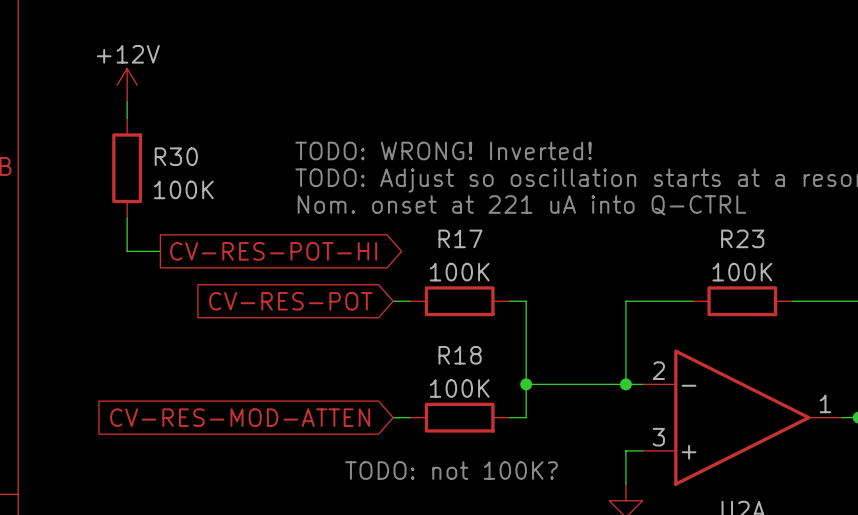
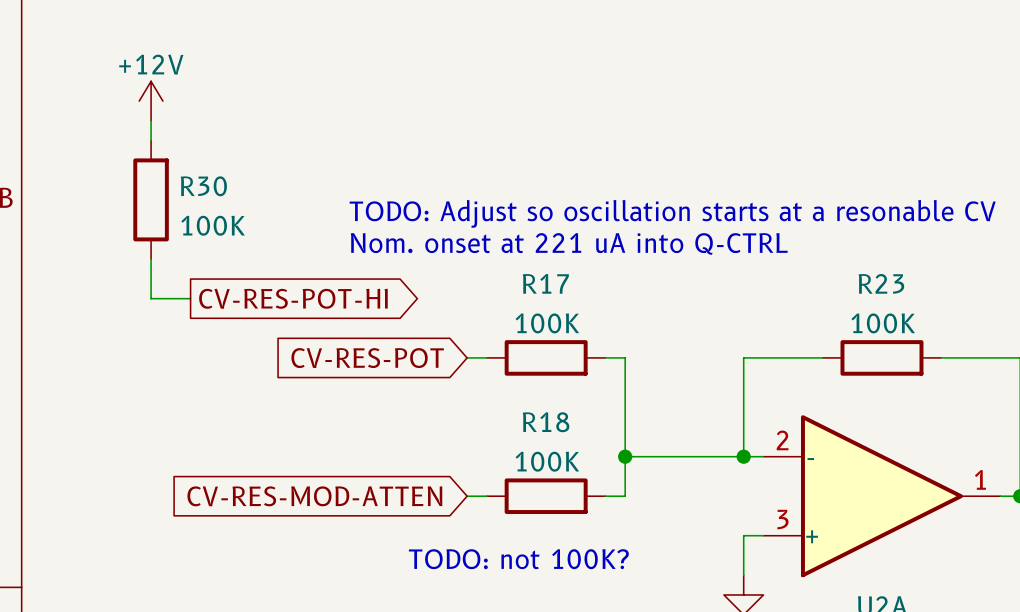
text: TODO: WRONG! Inverted! (443, 150) -> none

